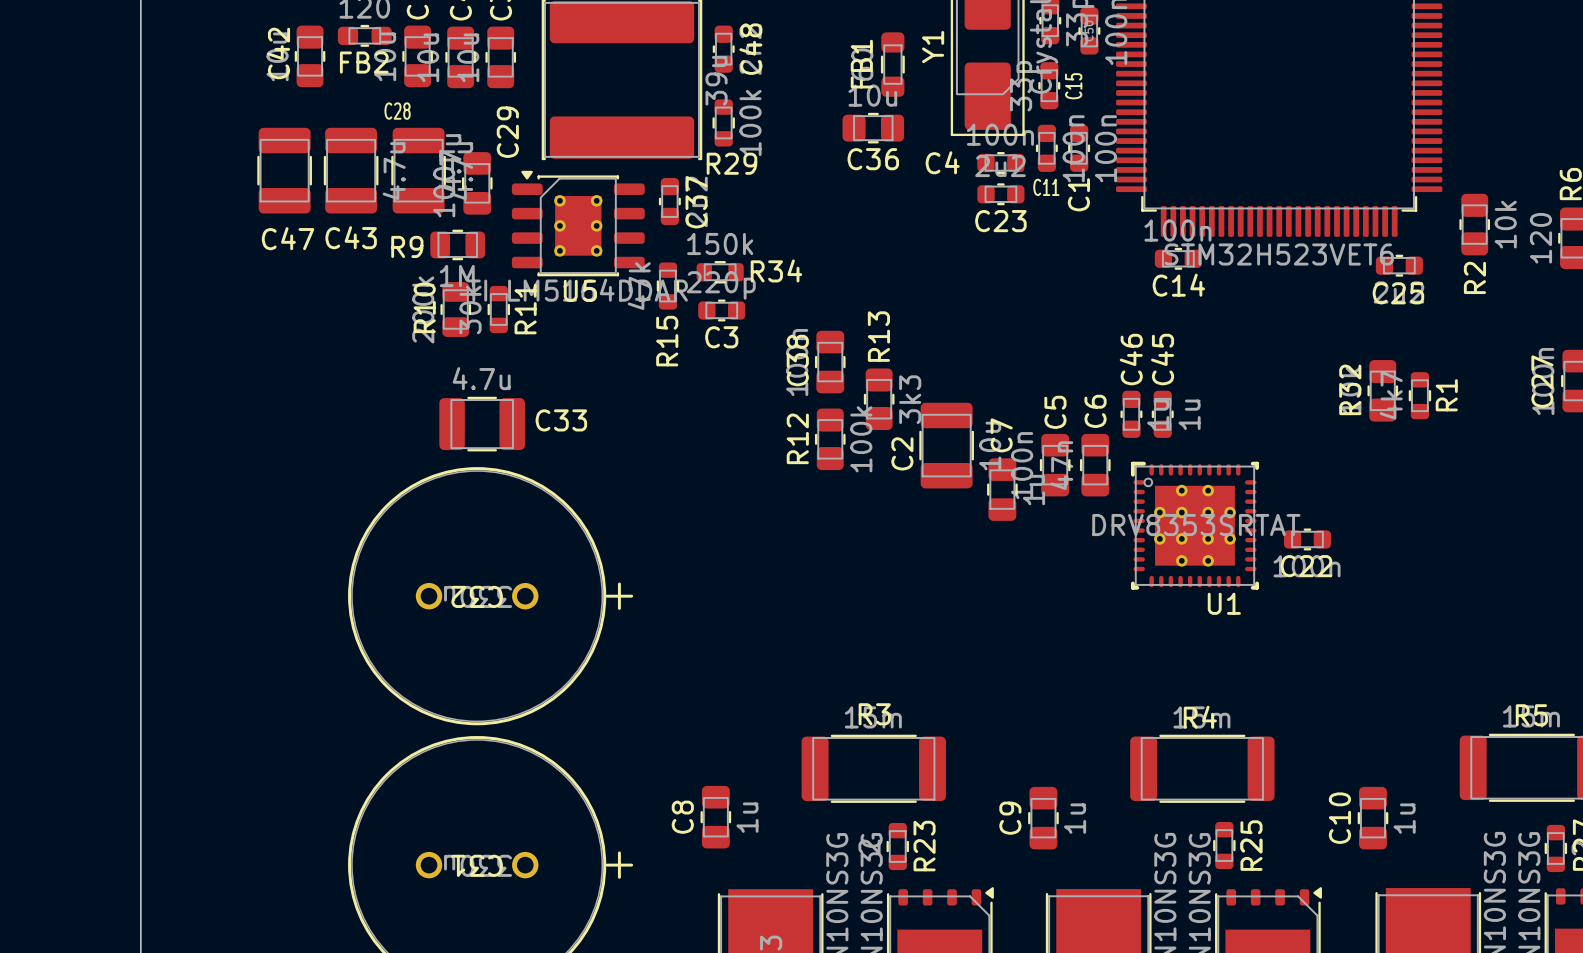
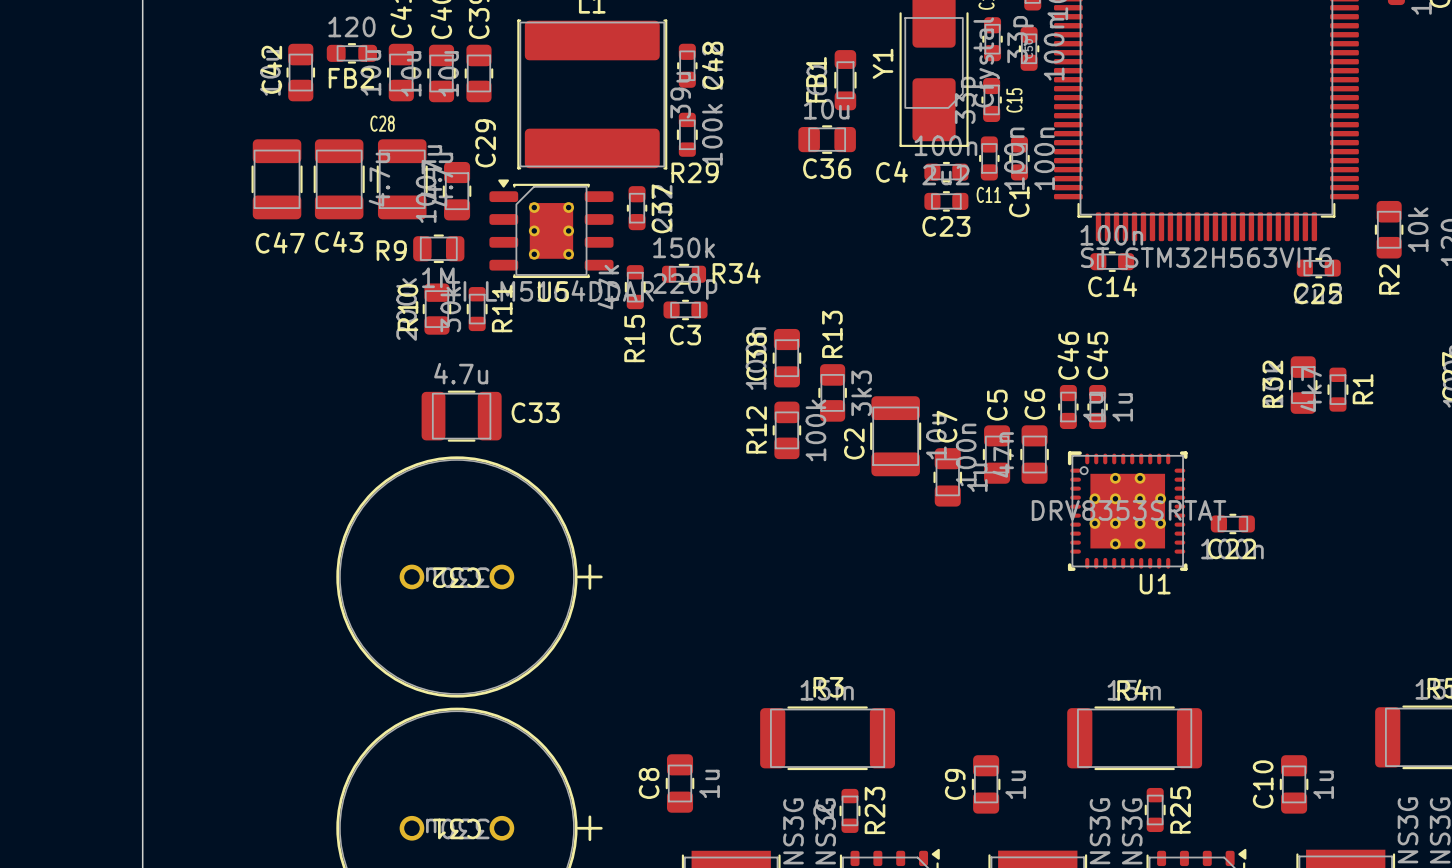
part value: STM32H523VET6 (1279, 254) -> ST STM32H563VIT6 (1206, 257)

